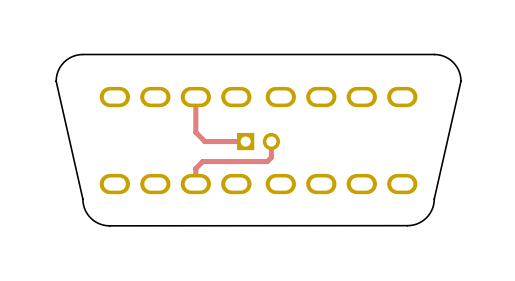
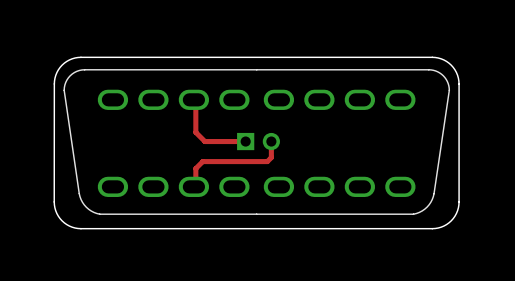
part footprint: [55, 53, 462, 227] -> [53, 57, 460, 229]

